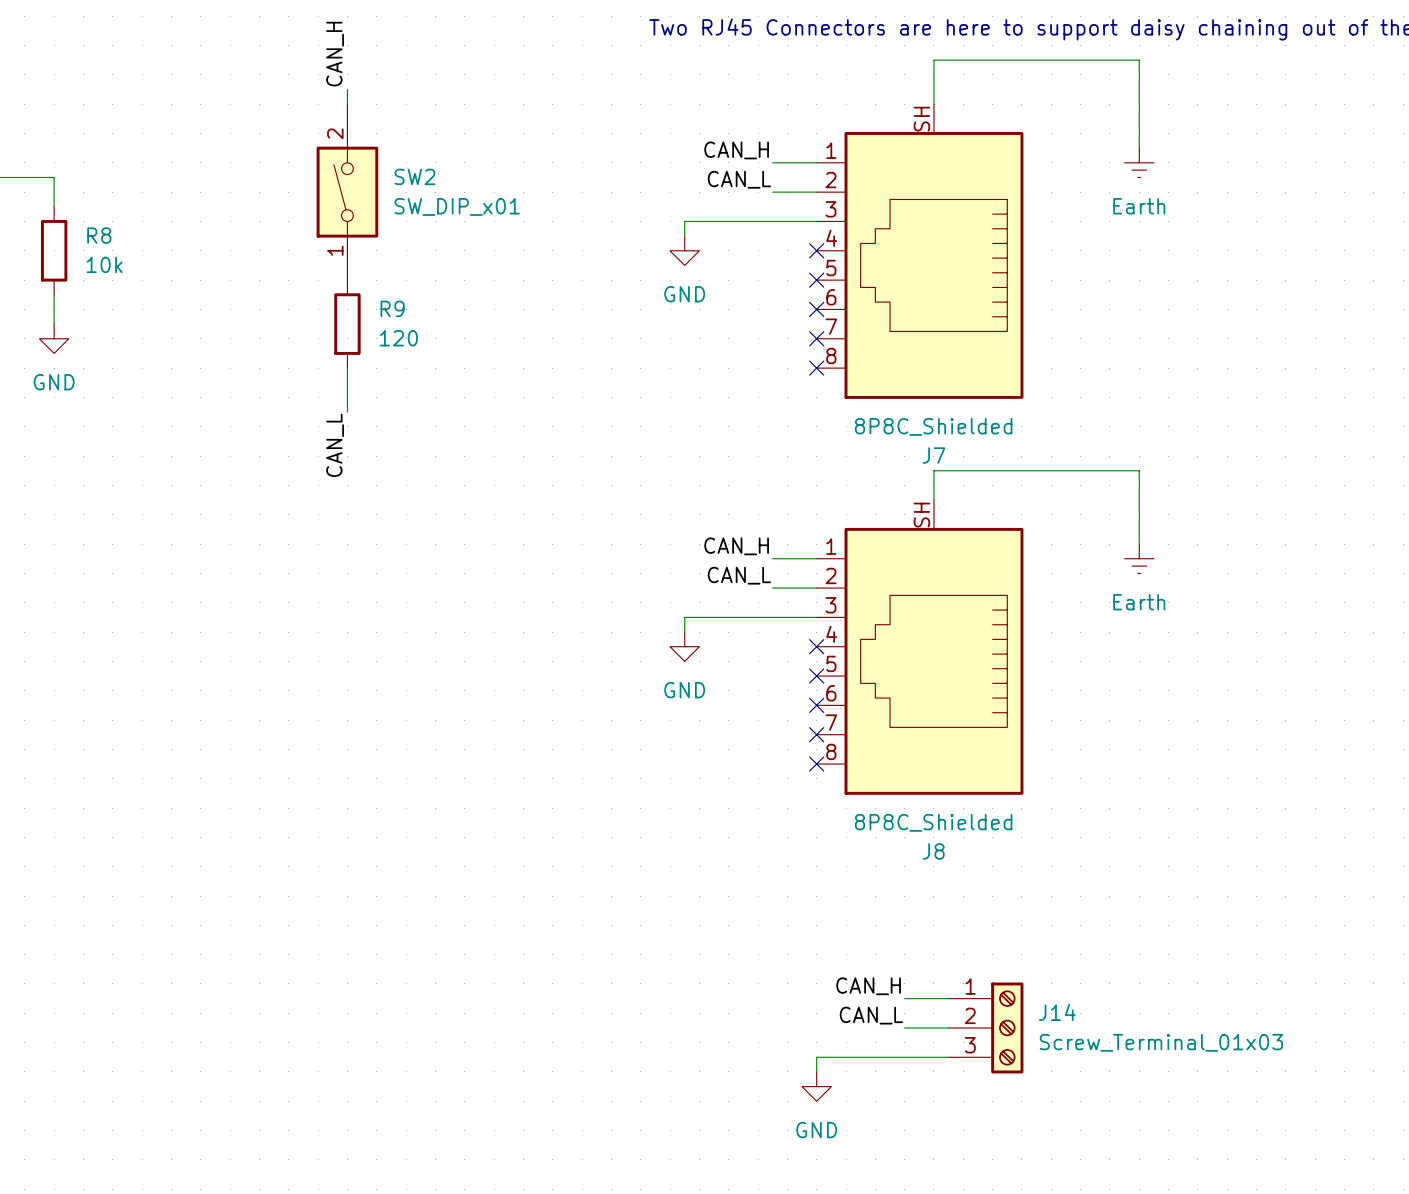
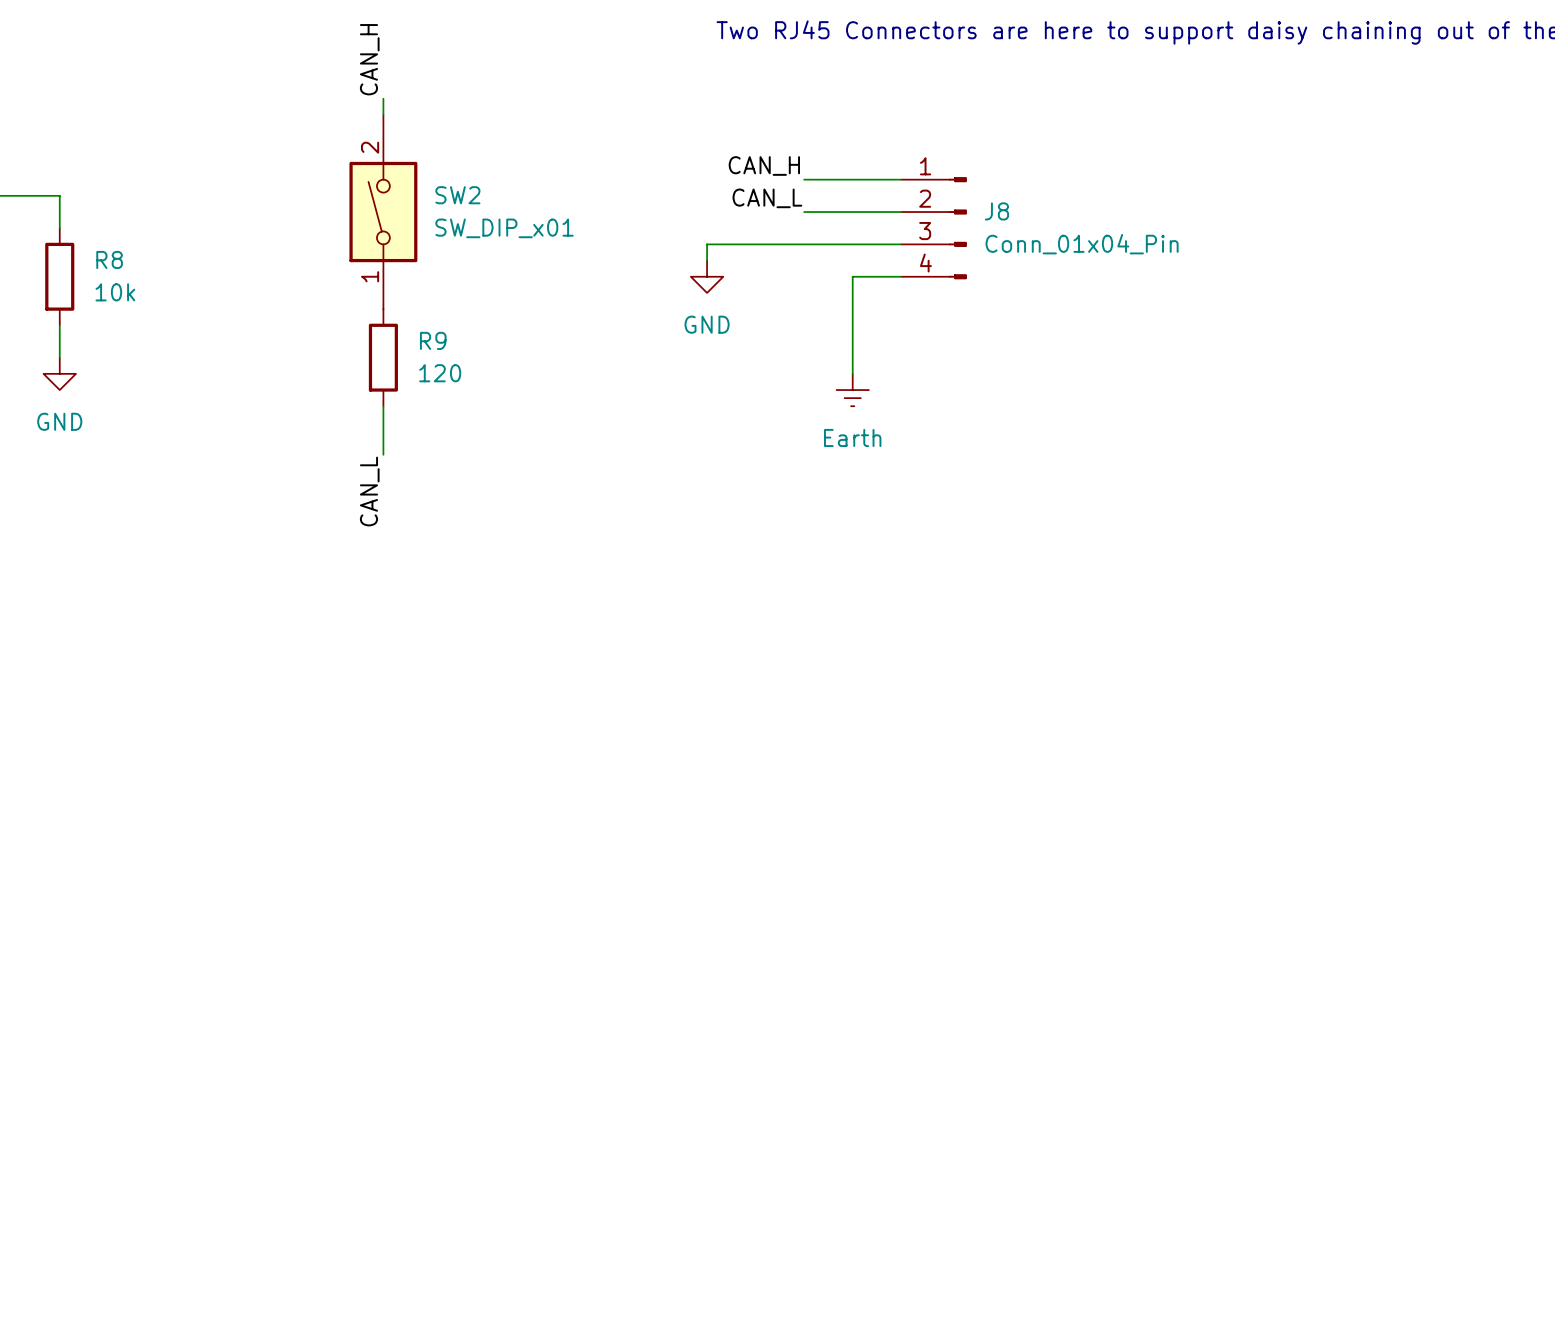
wire: (933, 104) (933, 60) (1139, 60) (1139, 148) -> none
label position: CAN_H (736, 150) -> CAN_H (764, 165)
wire: none -> (804, 179) (852, 179)
power symbol: Earth (1139, 162) -> none
label position: CAN_L (739, 179) -> CAN_L (767, 198)
wire: none -> (804, 212) (852, 212)
wire: (684, 221) (684, 236) -> (755, 244) (707, 244) (707, 260)
power symbol position: GND (684, 250) -> GND (707, 276)
wire: none -> (901, 276) (852, 276) (852, 373)
no-connect mark: (816, 250) -> none
J7: 8P8C_Shielded (920, 251) -> none
no-connect mark: (816, 280) -> none
no-connect mark: (816, 309) -> none
no-connect mark: (816, 338) -> none
power symbol: none -> Earth (852, 390)
no-connect mark: (816, 368) -> none
J8 symbol: [816, 500, 1024, 795] -> [901, 177, 967, 280]
wire: (933, 500) (933, 470) (1139, 470) (1139, 544) -> none
label: CAN_H (736, 546) -> none
wire: (772, 558) (816, 558) -> none
power symbol: Earth (1139, 558) -> none
label: CAN_L (739, 575) -> none
wire: (772, 588) (816, 588) -> none
wire: (816, 617) (684, 617) (684, 632) -> none
power symbol: GND (684, 646) -> none
no-connect mark: (816, 646) -> none
no-connect mark: (816, 676) -> none
no-connect mark: (816, 705) -> none
no-connect mark: (816, 734) -> none
no-connect mark: (816, 764) -> none
J8 value: 8P8C_Shielded (933, 822) -> Conn_01x04_Pin (1082, 244)
J8 name position: J8 (933, 851) -> J8 (996, 211)
label: CAN_H (868, 986) -> none
wire: (904, 998) (948, 998) -> none
label: CAN_L (871, 1015) -> none
wire: (904, 1027) (948, 1027) -> none
J14: Screw_Terminal_01x03 (986, 1027) -> none
wire: (948, 1057) (816, 1057) (816, 1071) -> none
power symbol: GND (816, 1086) -> none

